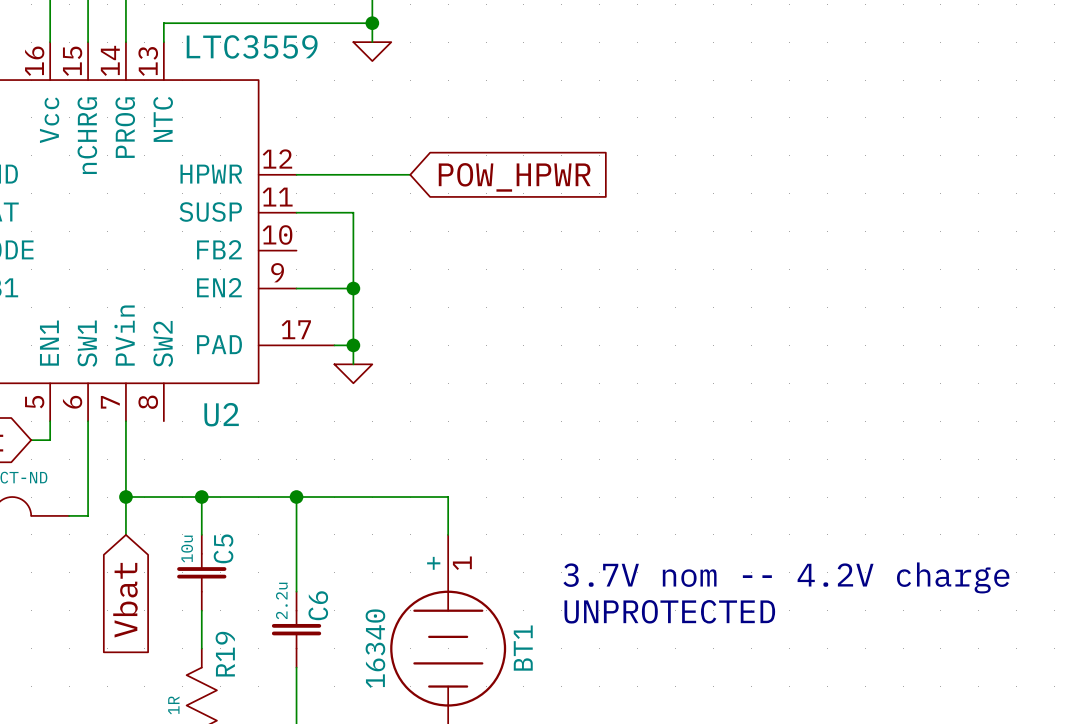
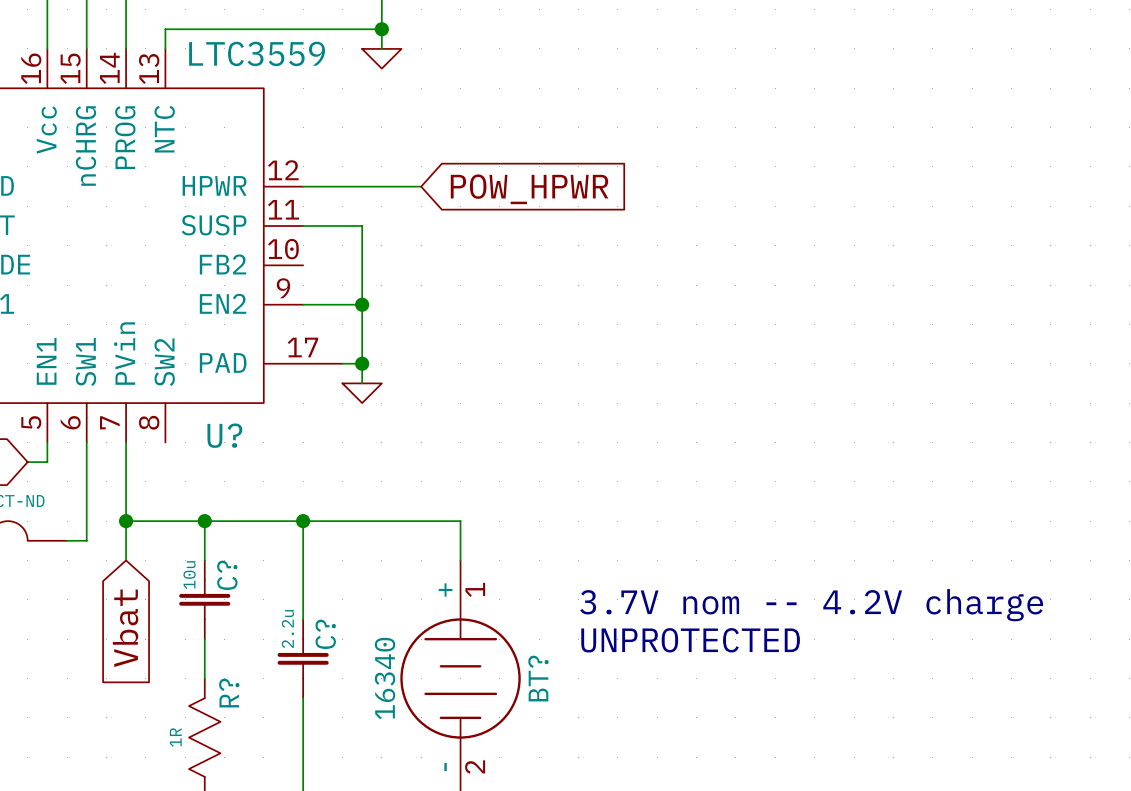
U2 name: U2 (221, 414) -> U? (224, 435)
C5 name: C5 (223, 548) -> C? (227, 575)
C6 name: C6 (318, 605) -> C? (325, 634)
BT1 name: BT1 (523, 648) -> BT? (538, 678)
R19 name: R19 (225, 654) -> R? (229, 693)

